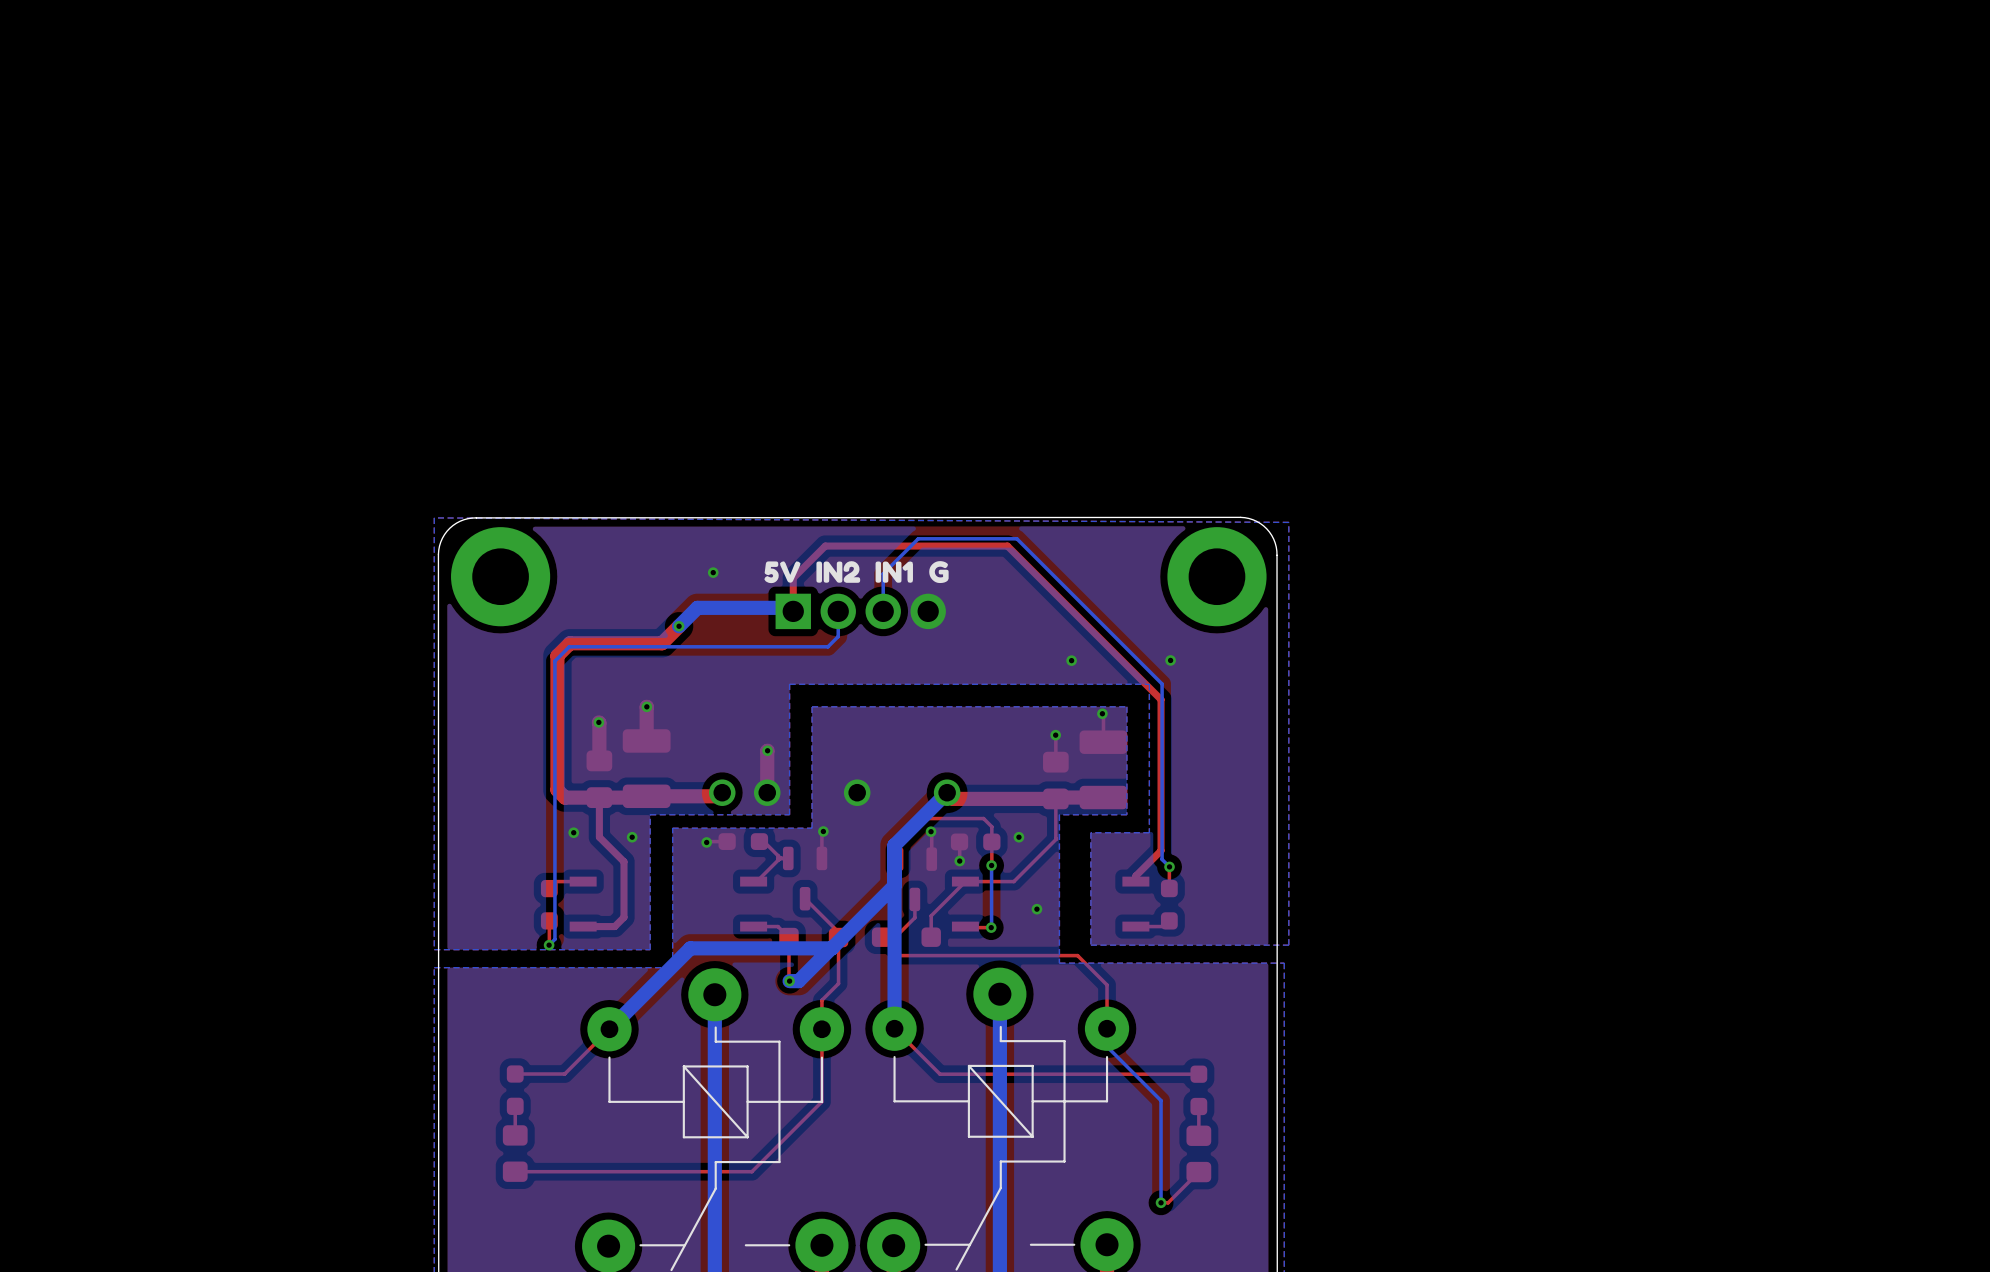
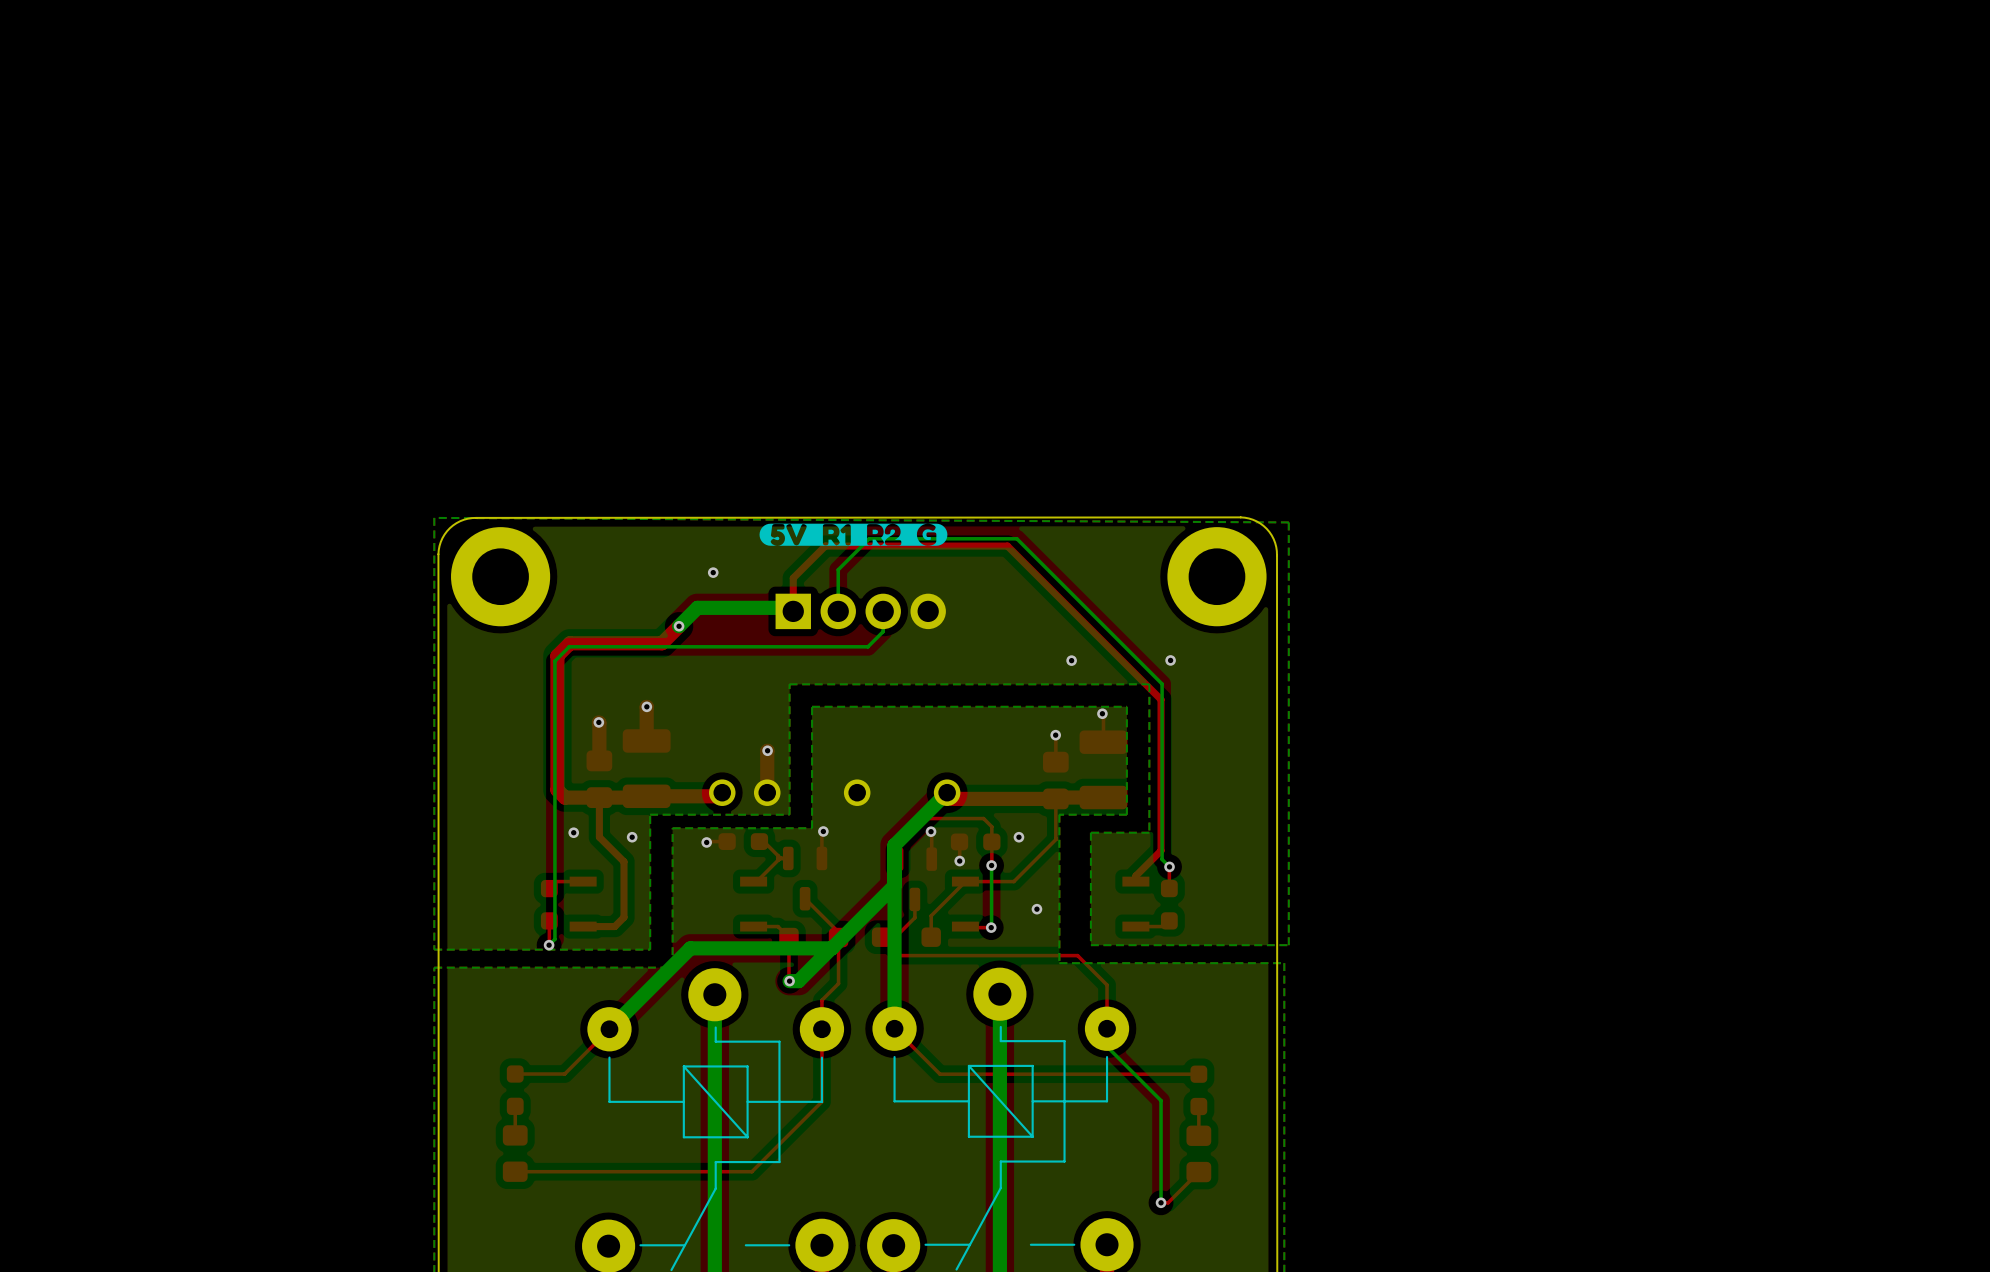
drawing: none -> [759, 523, 948, 546]
bottom track: (918, 538) (883, 573) (883, 601) (878, 606) -> (918, 538) (869, 538) (838, 569) (838, 611)
drawing: [764, 561, 949, 584] -> none
bottom track: (838, 611) (838, 636) (827, 646) -> (883, 611) (883, 631) (867, 646) (827, 646)

